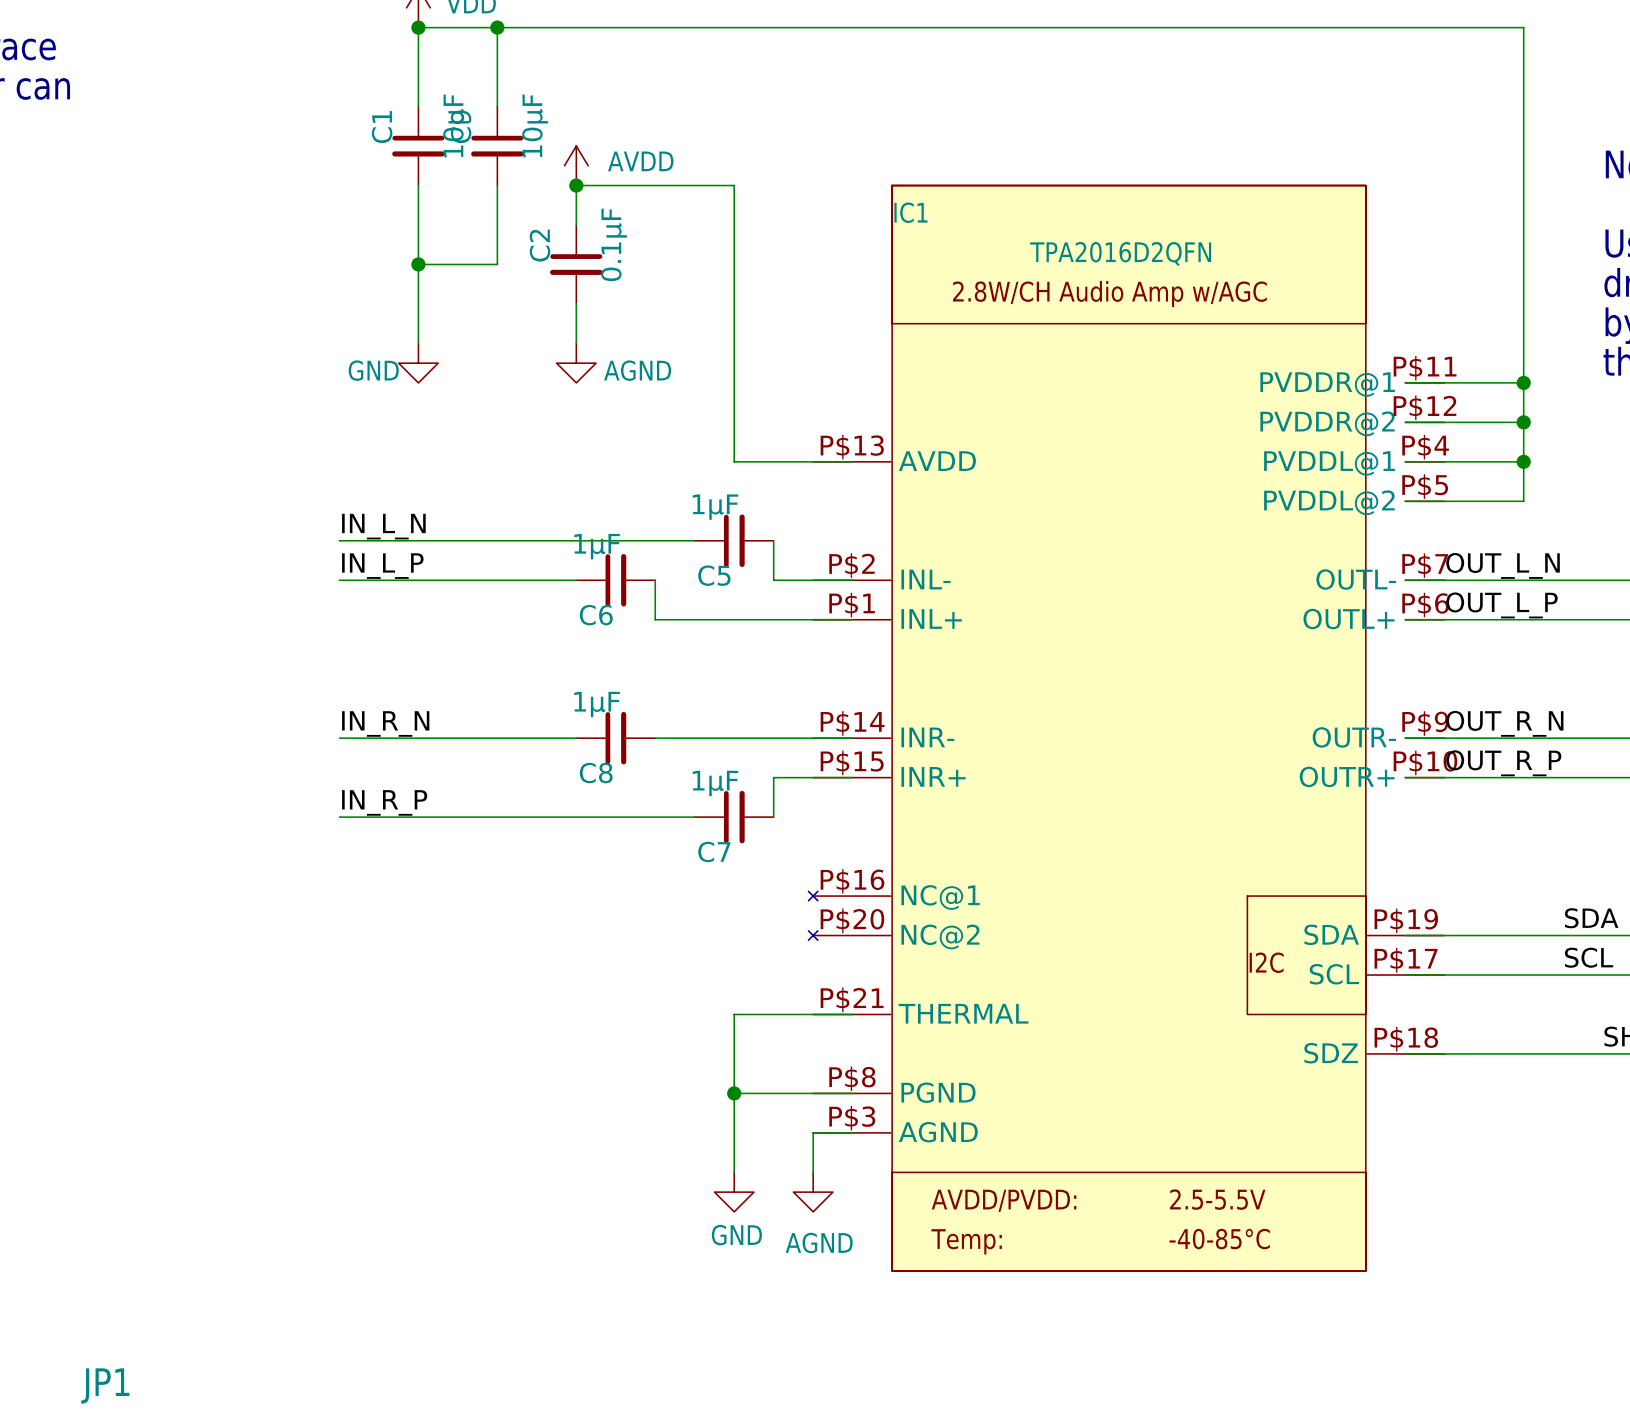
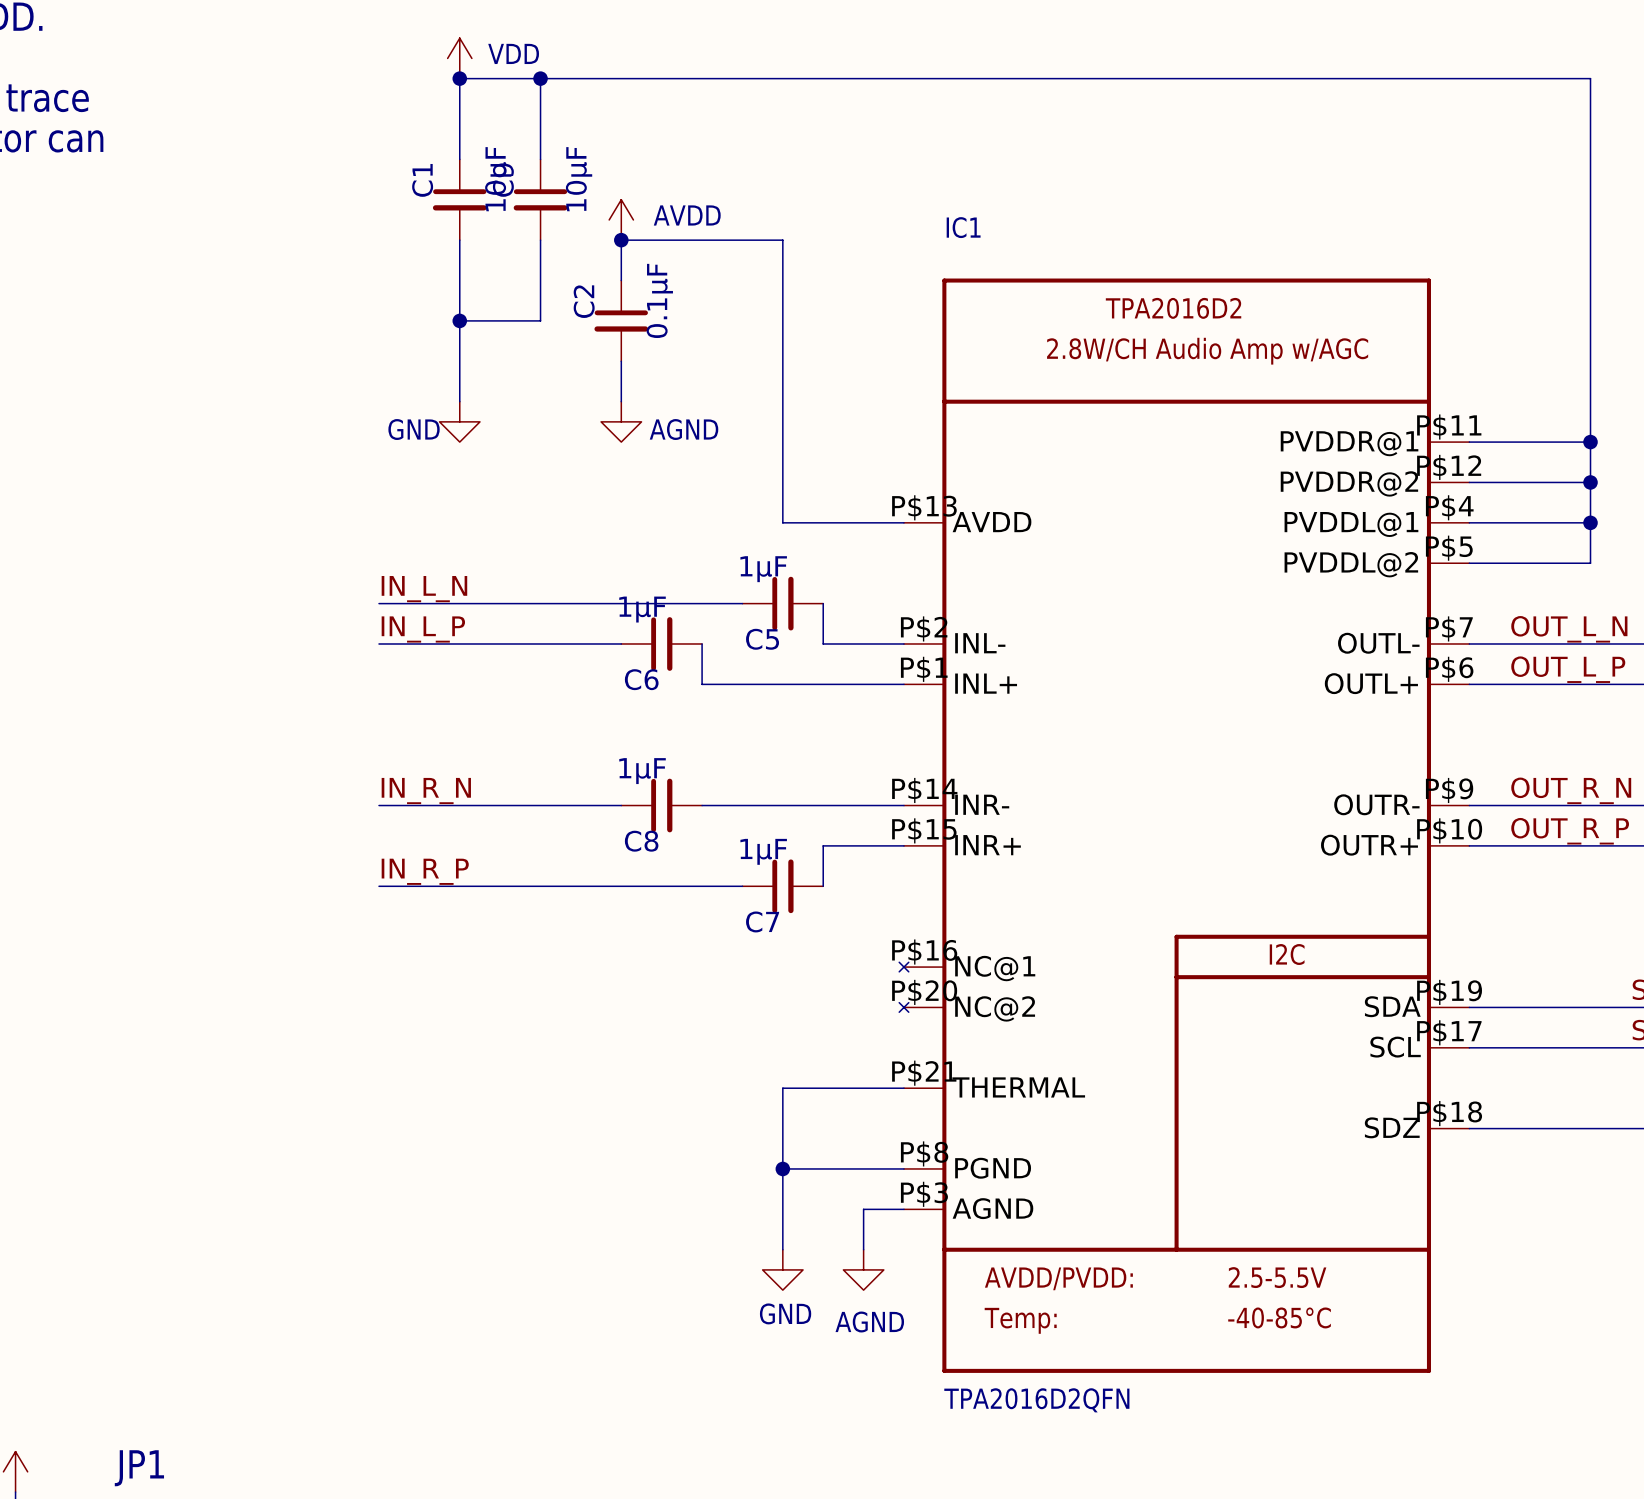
IC1 symbol: [808, 185, 1445, 1272] -> [899, 278, 1470, 1373]
IC1 name position: IC1 (910, 212) -> IC1 (963, 227)
IC1 value position: TPA2016D2QFN (1120, 253) -> TPA2016D2QFN (1036, 1400)

